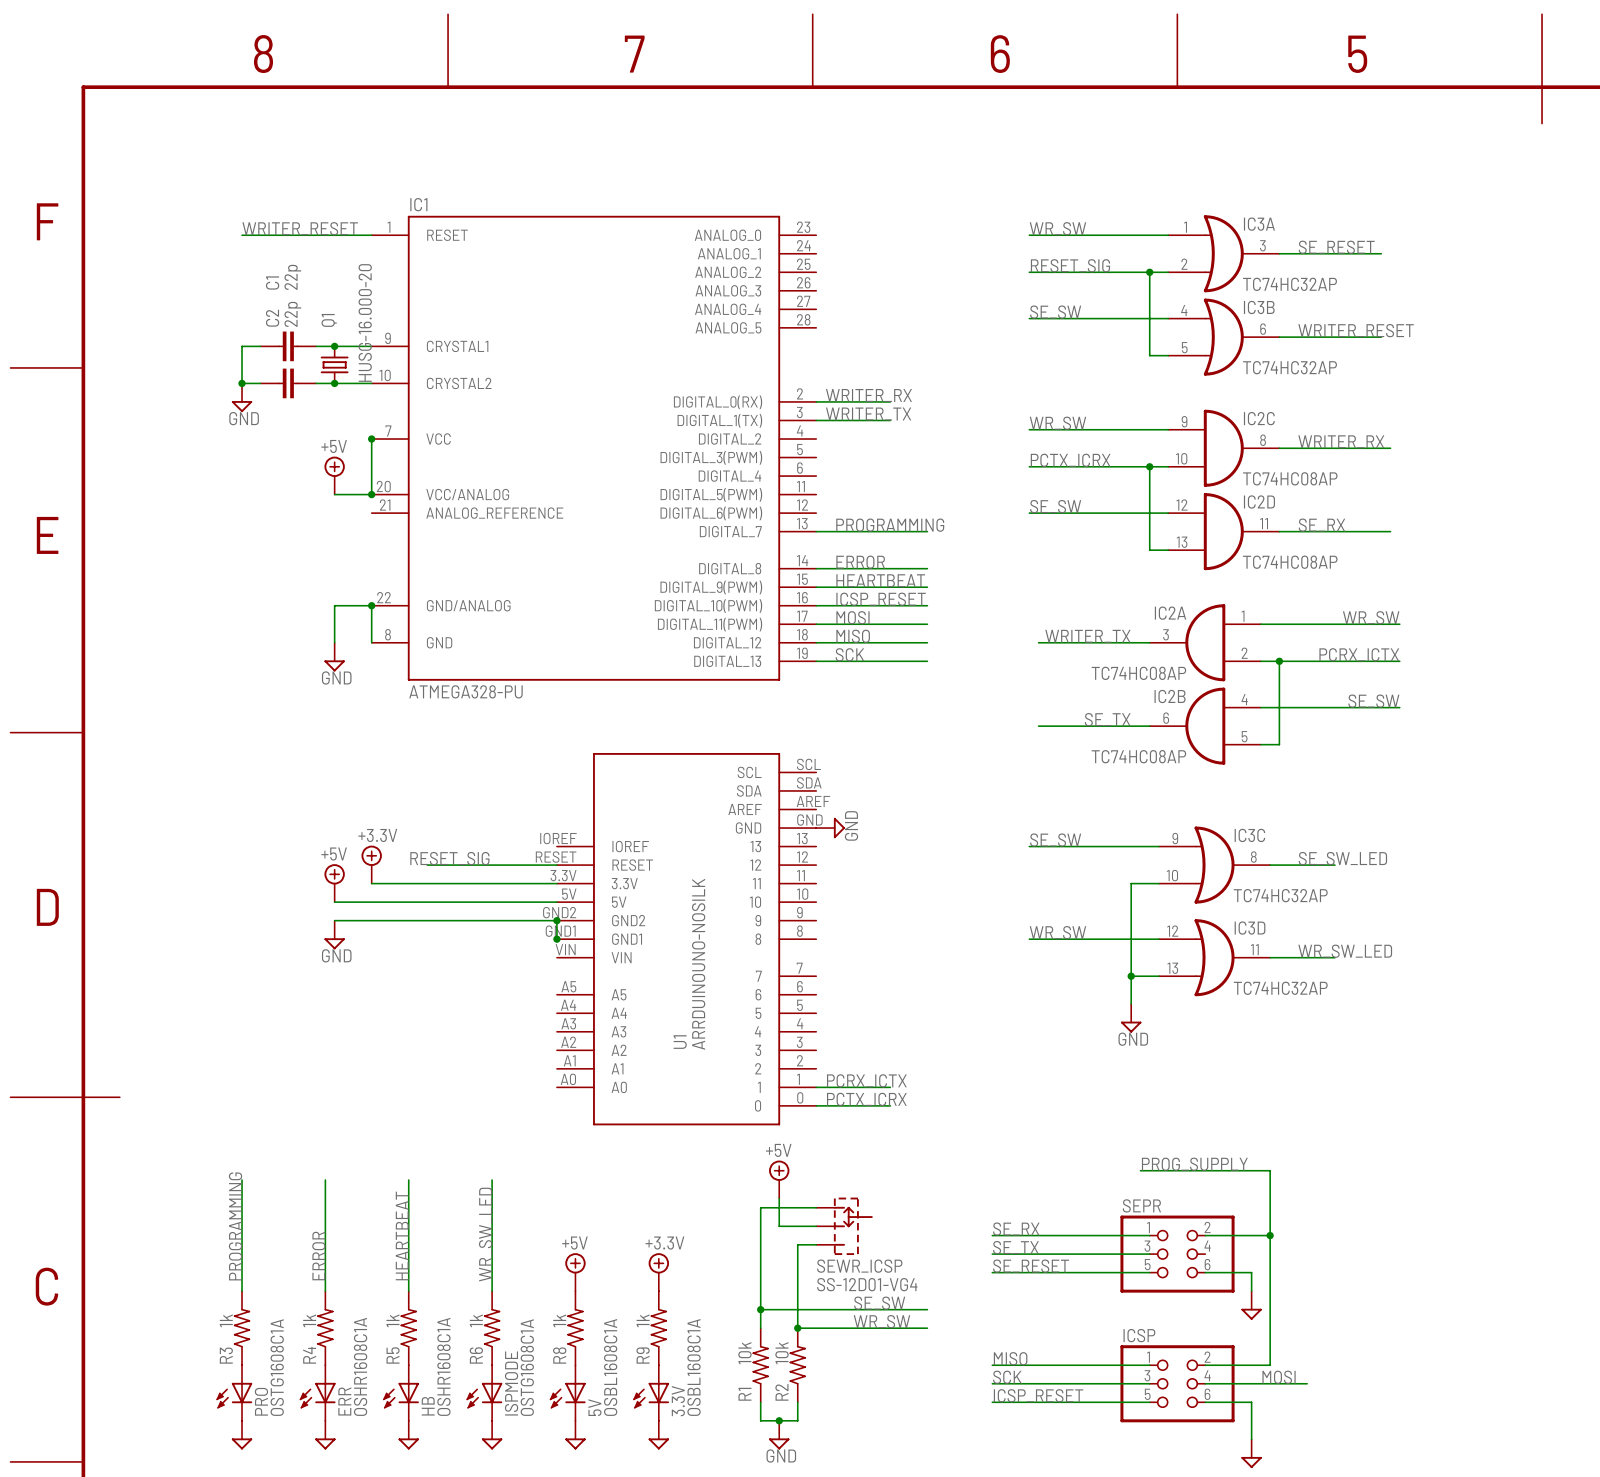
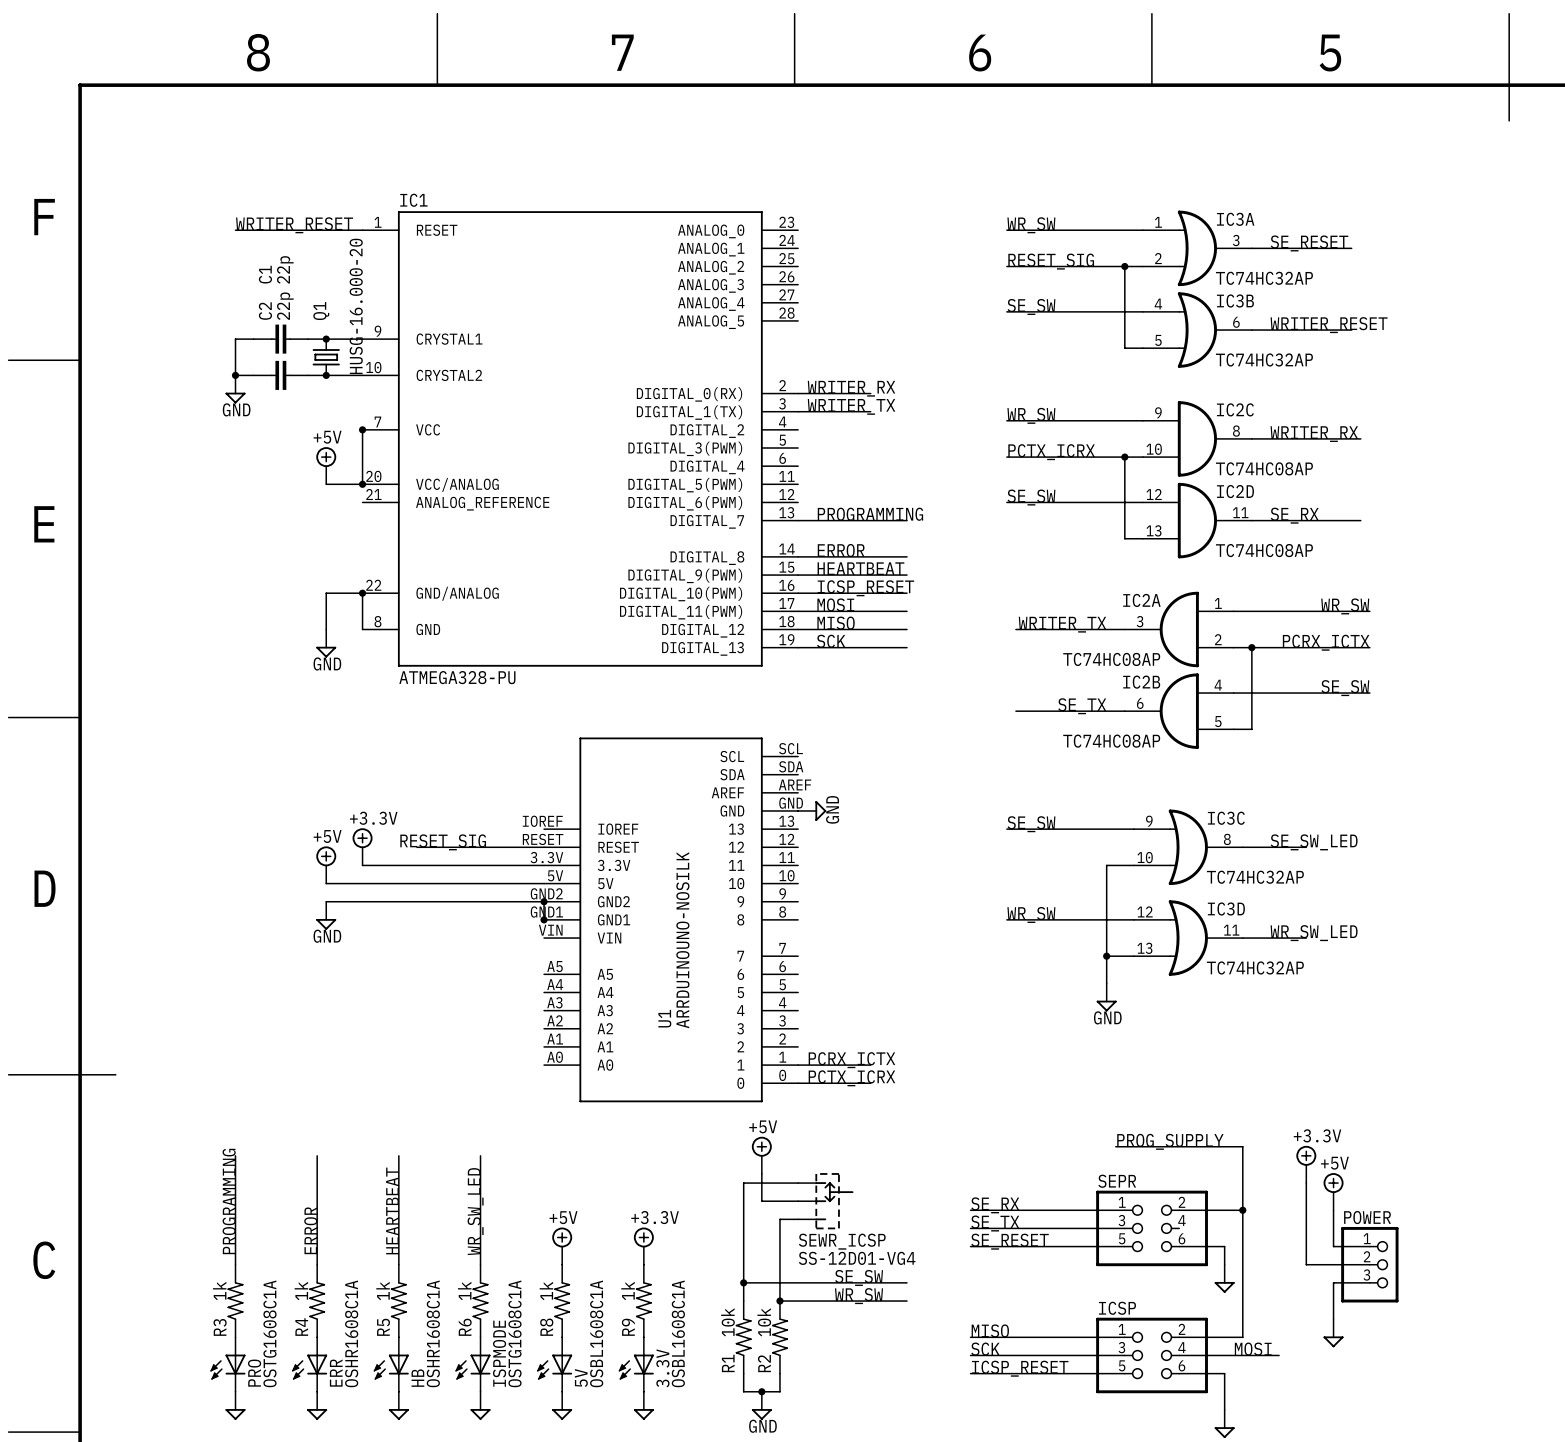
power symbol: none -> +3.3V (1306, 1164)
wire: none -> (1306, 1183) (1306, 1264) (1369, 1264)
power symbol: none -> +5V (1333, 1191)
wire: none -> (1333, 1210) (1333, 1246) (1369, 1246)
POWER: none -> (1369, 1264)
wire: none -> (1369, 1282) (1333, 1282) (1333, 1319)
power symbol: none -> (1333, 1333)

